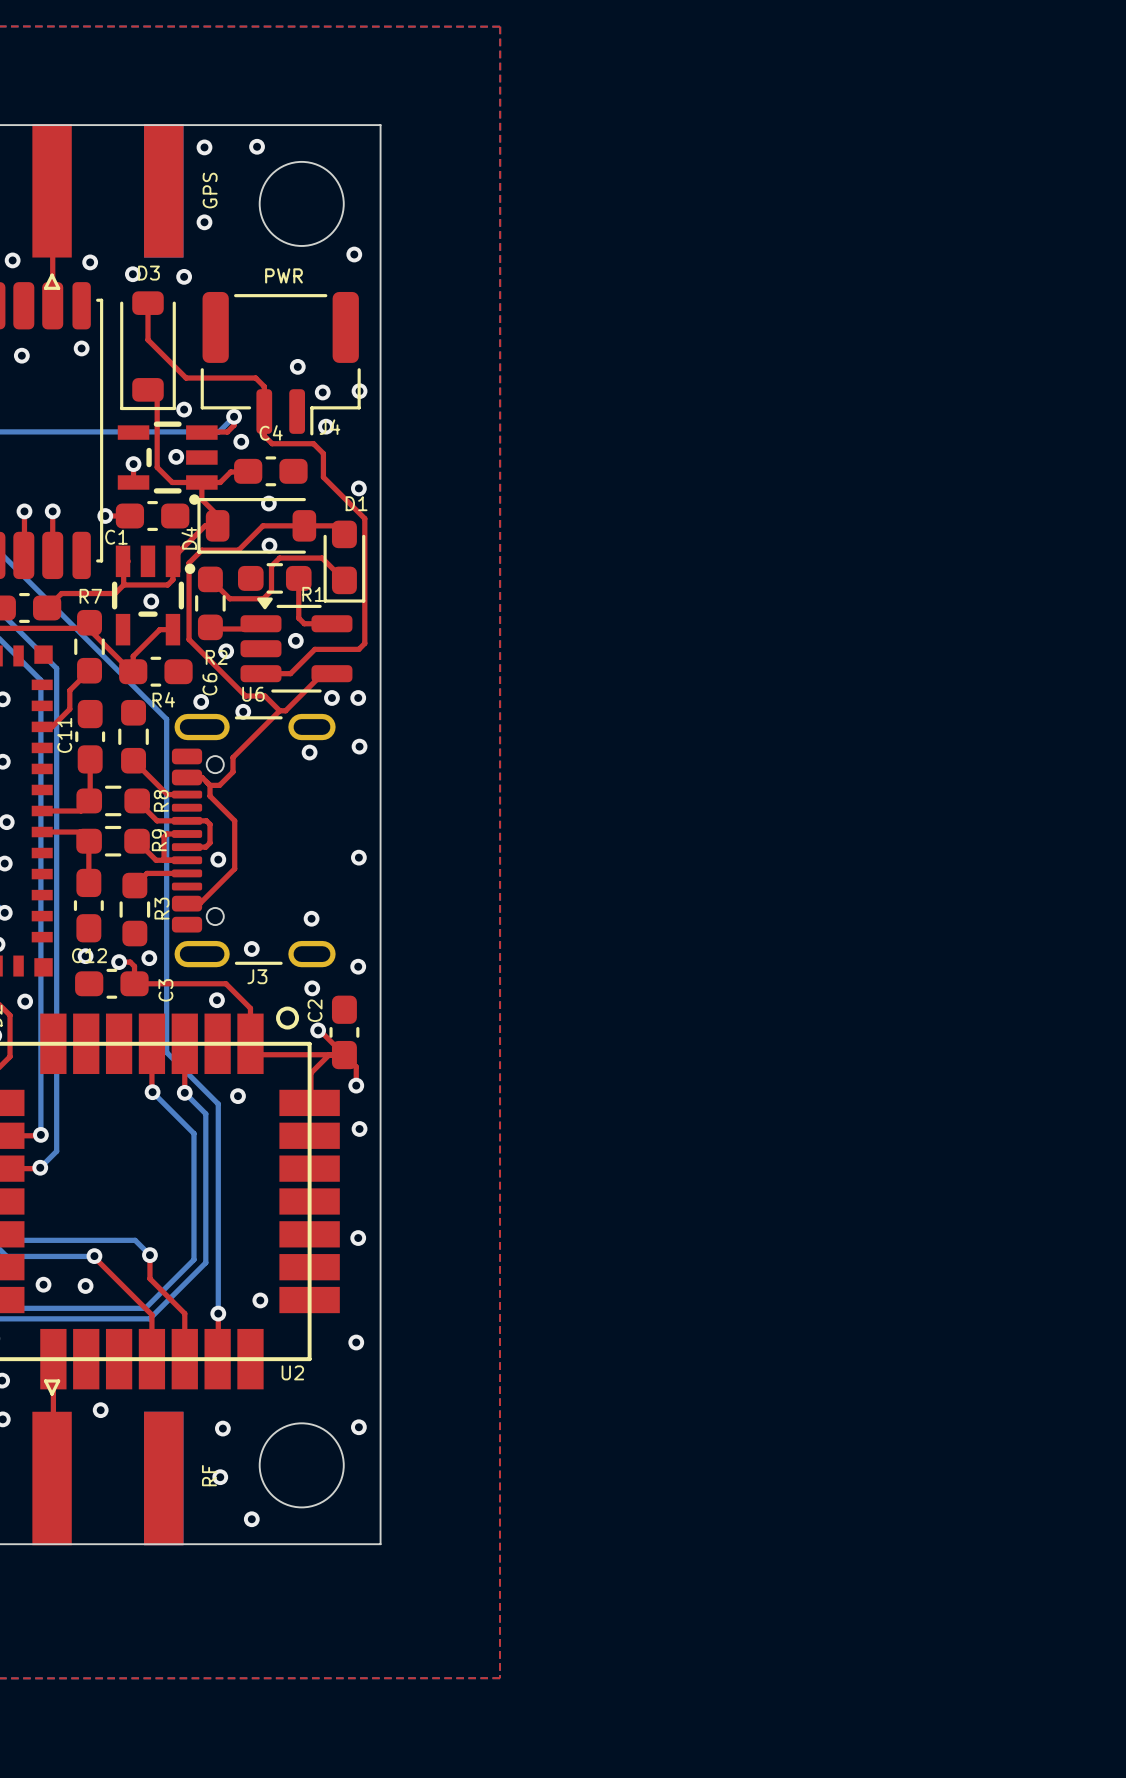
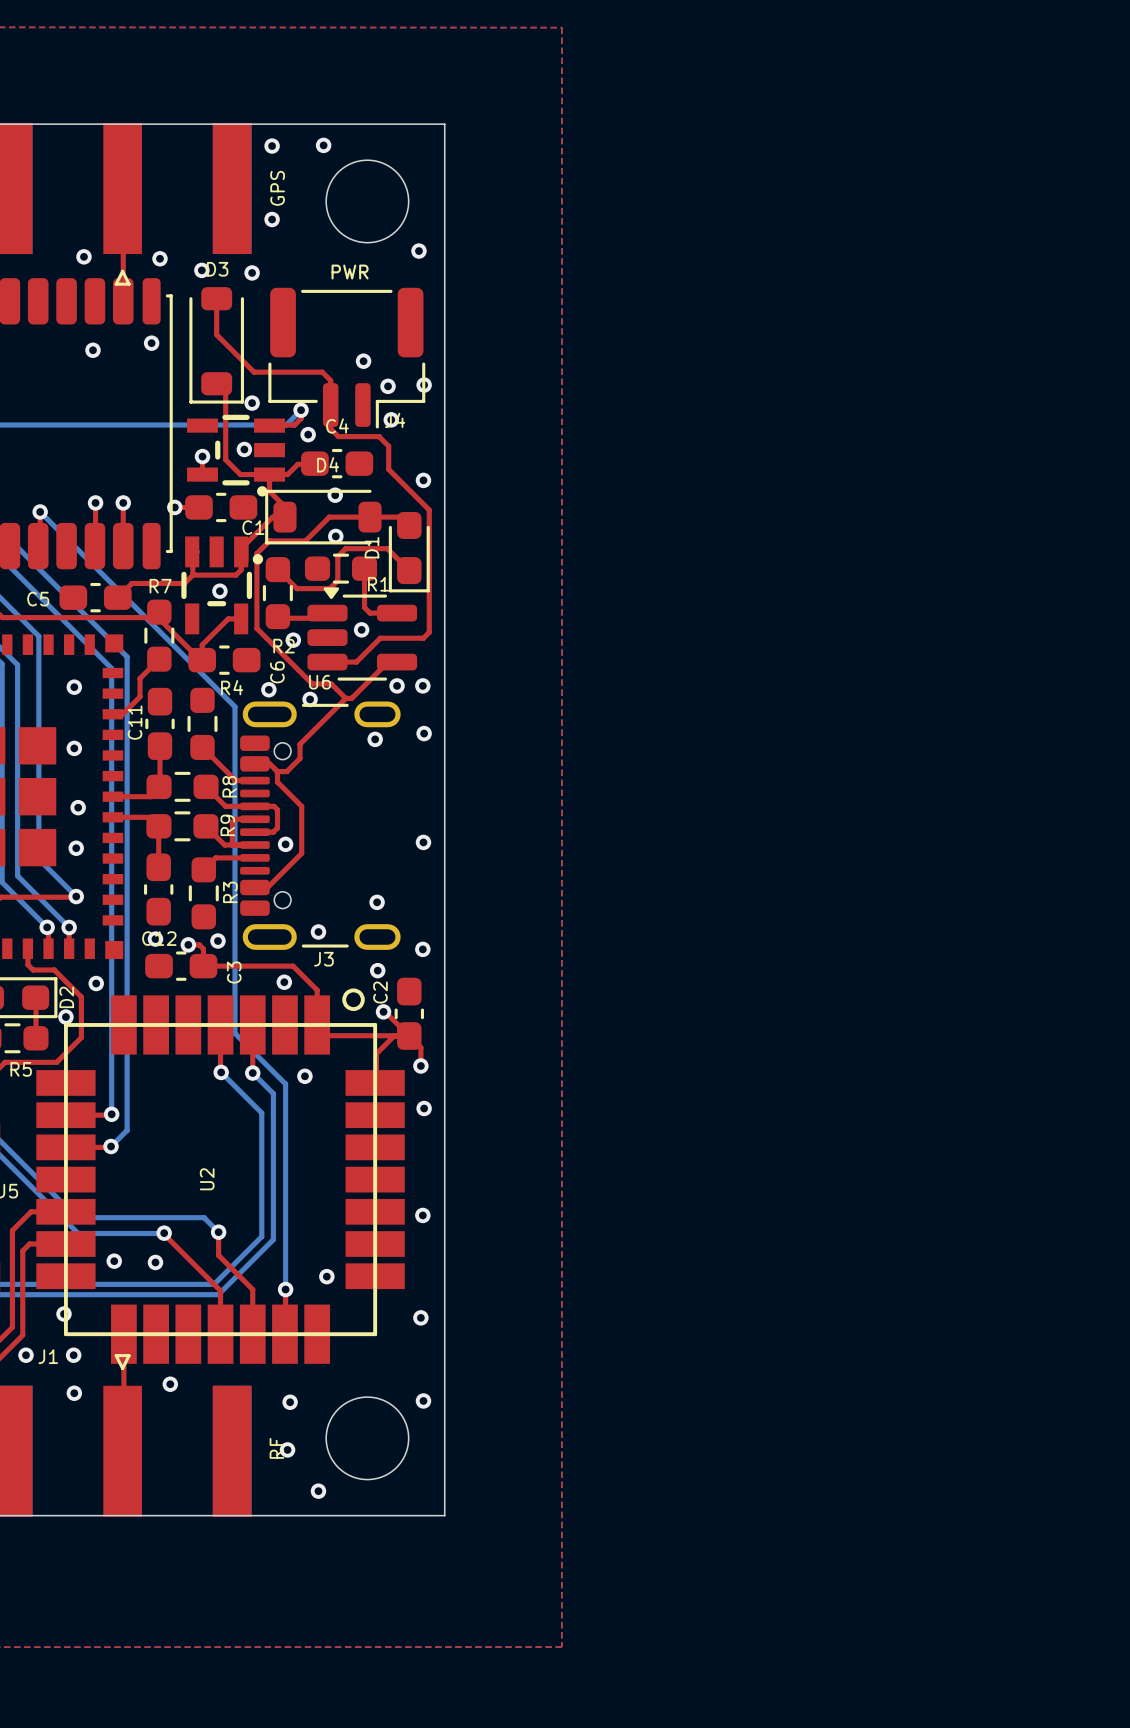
D1 name rotation: 0° (356, 503) -> 90° counterclockwise (371, 547)
D1 name position: D1 (356, 503) -> D1 (371, 547)
C1 name position: C1 (116, 537) -> C1 (253, 527)
D4 name rotation: 0° (189, 538) -> 90° clockwise (328, 464)
D4 name position: D4 (189, 538) -> D4 (328, 464)
U2 name rotation: 0° (292, 1372) -> 90° counterclockwise (207, 1179)
U2 name position: U2 (292, 1372) -> U2 (207, 1179)

